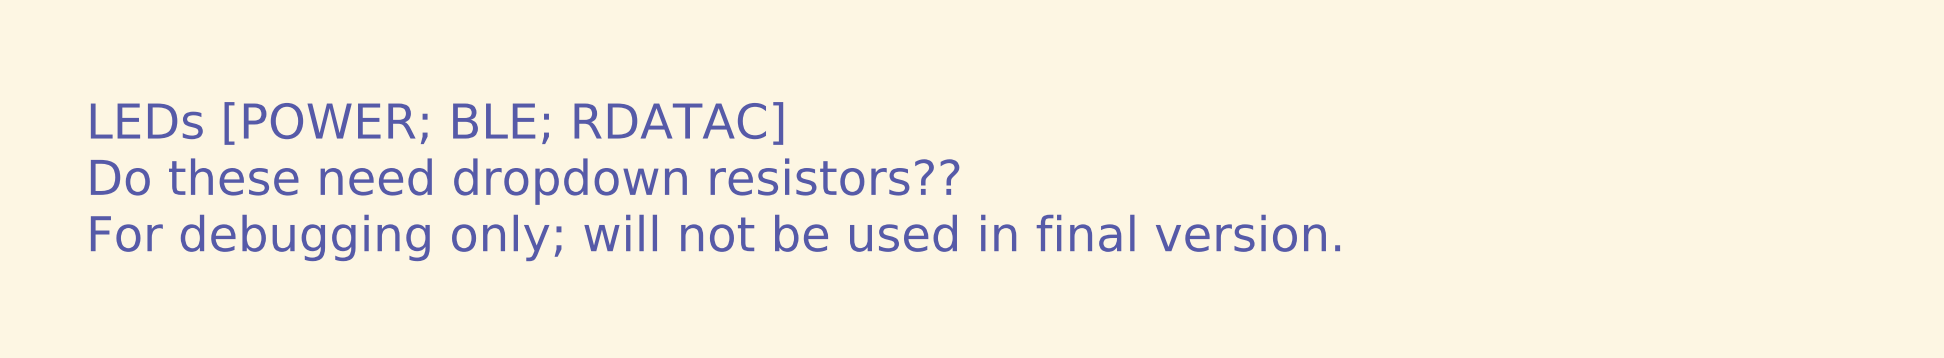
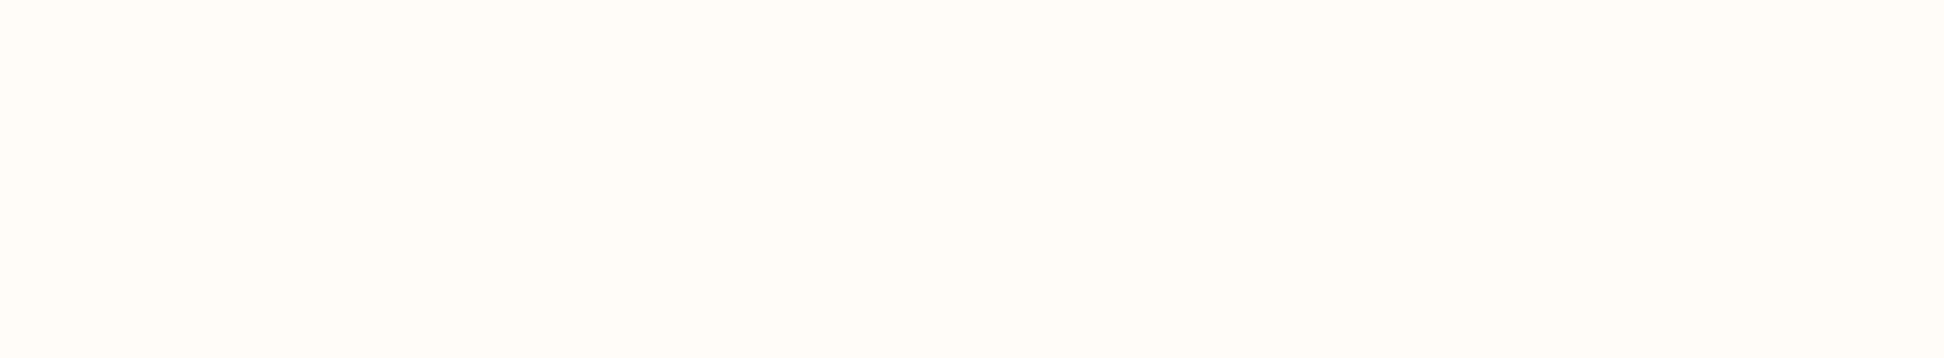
text: LEDs [POWER; BLE; RDATAC] (437, 123) -> none
text: Do these need dropdown resistors?? (525, 181) -> none
text: For debugging only; will not be used in final version. (715, 237) -> none

